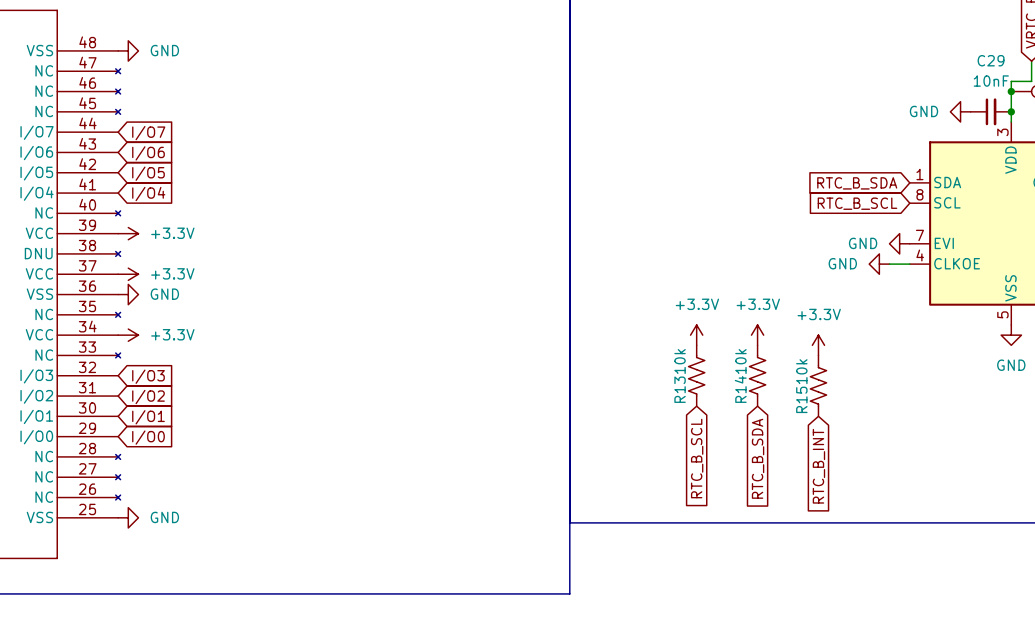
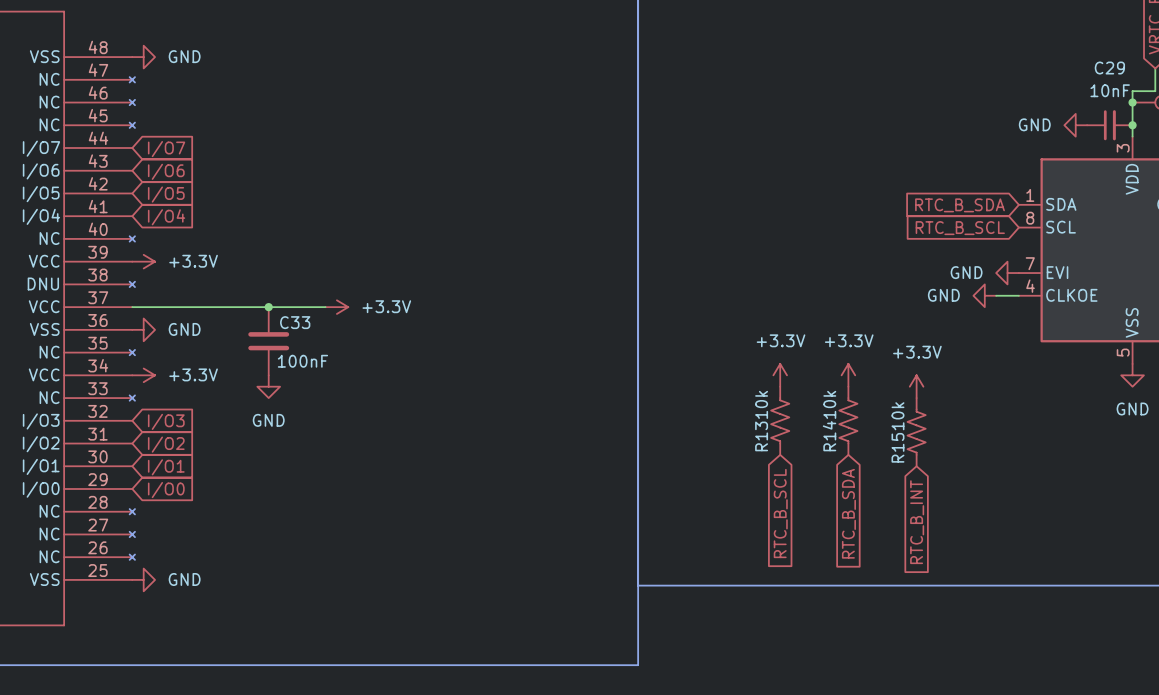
wire: none -> (132, 307) (325, 307)
power symbol position: +3.3V (128, 274) -> +3.3V (336, 307)
junction: none -> (268, 307)
C33: none -> 100nF (268, 341)
power symbol: none -> GND (268, 386)

